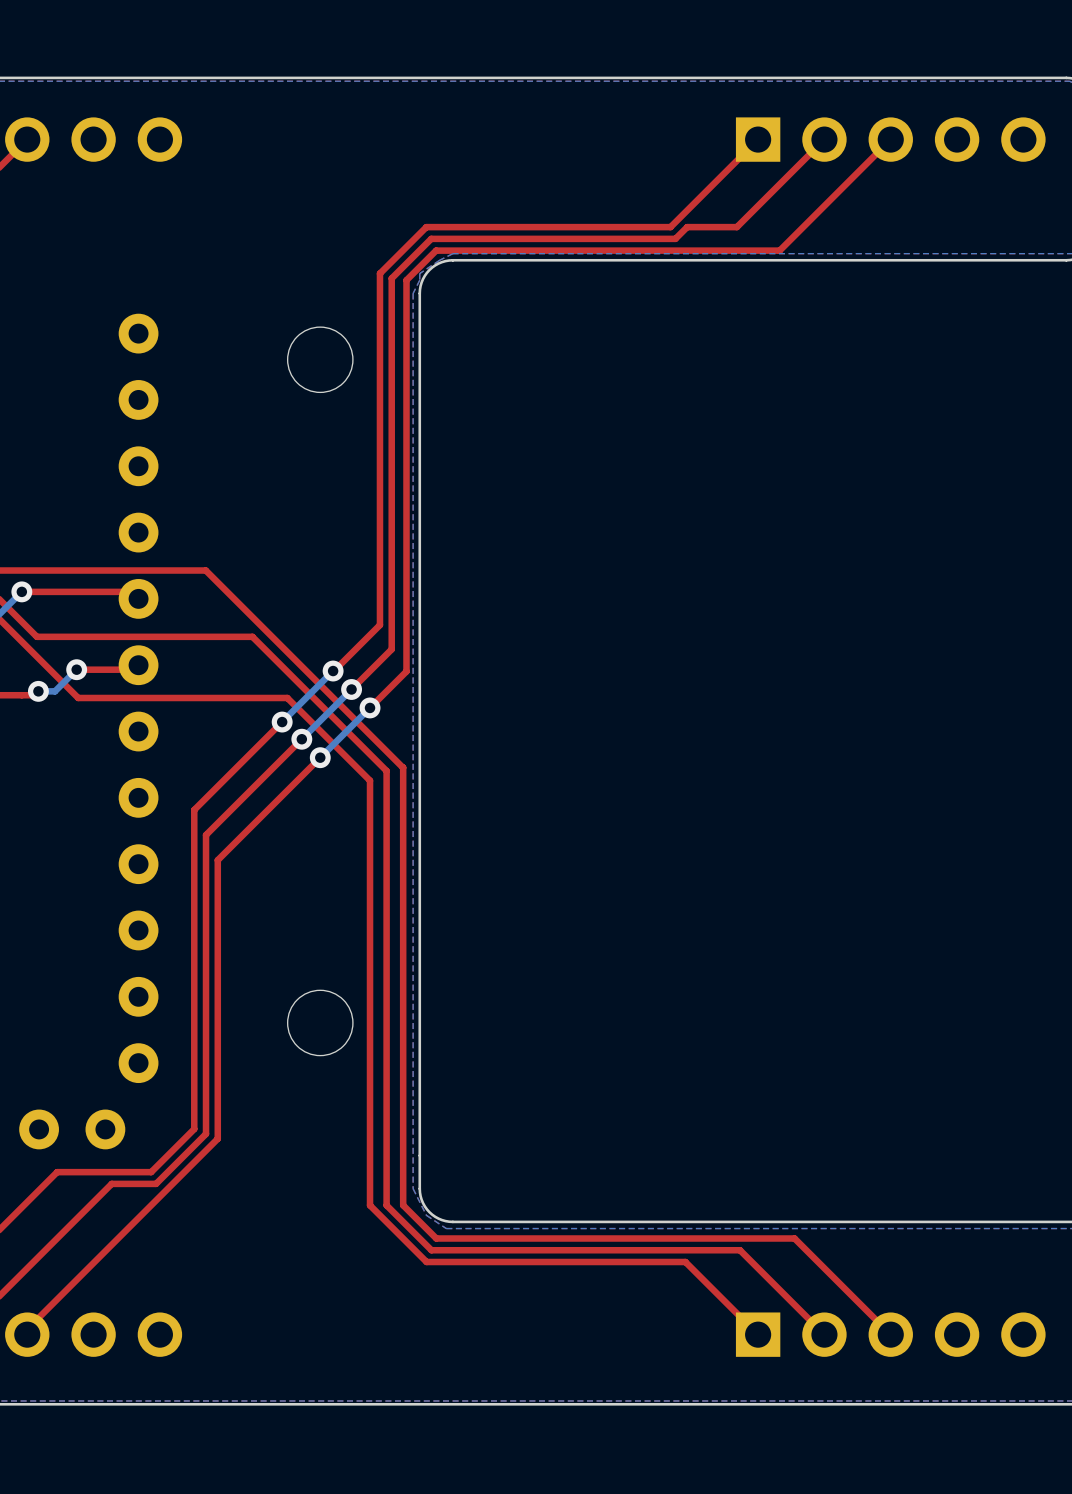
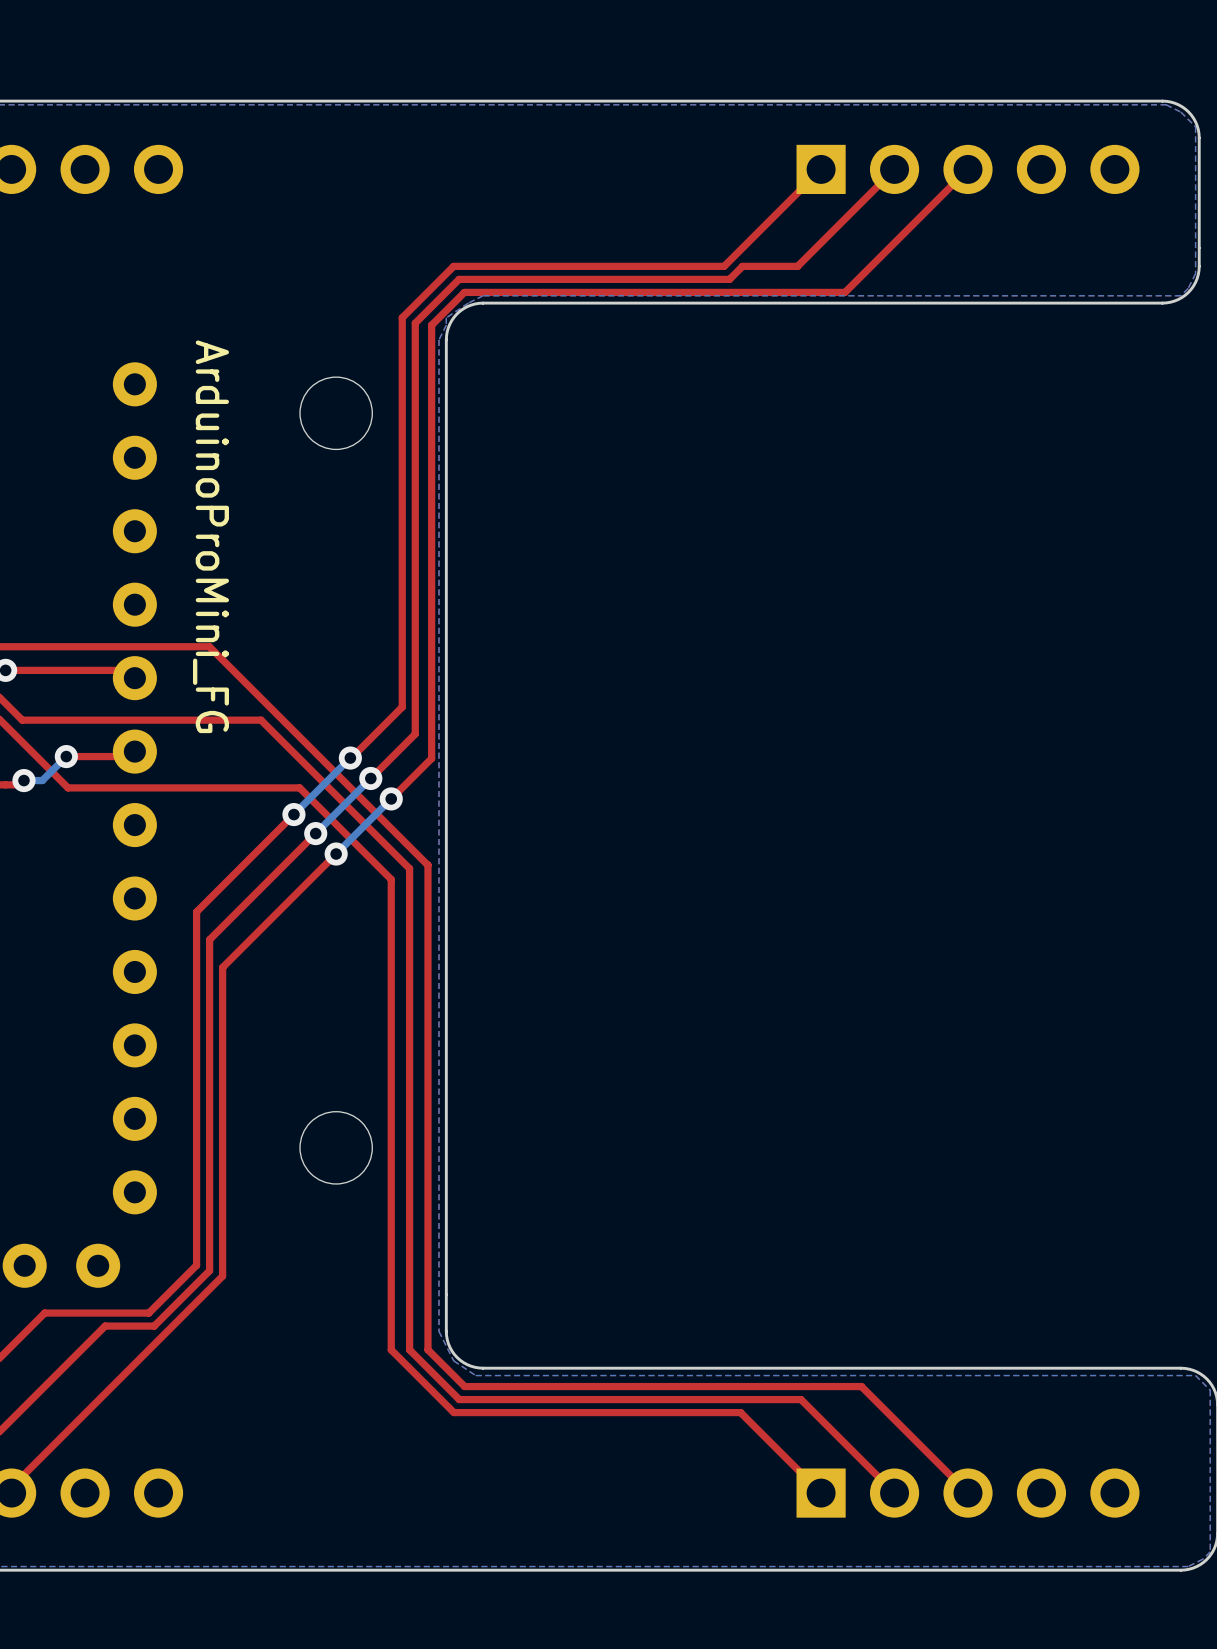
part value: none -> ArduinoProMini_FG (210, 536)

